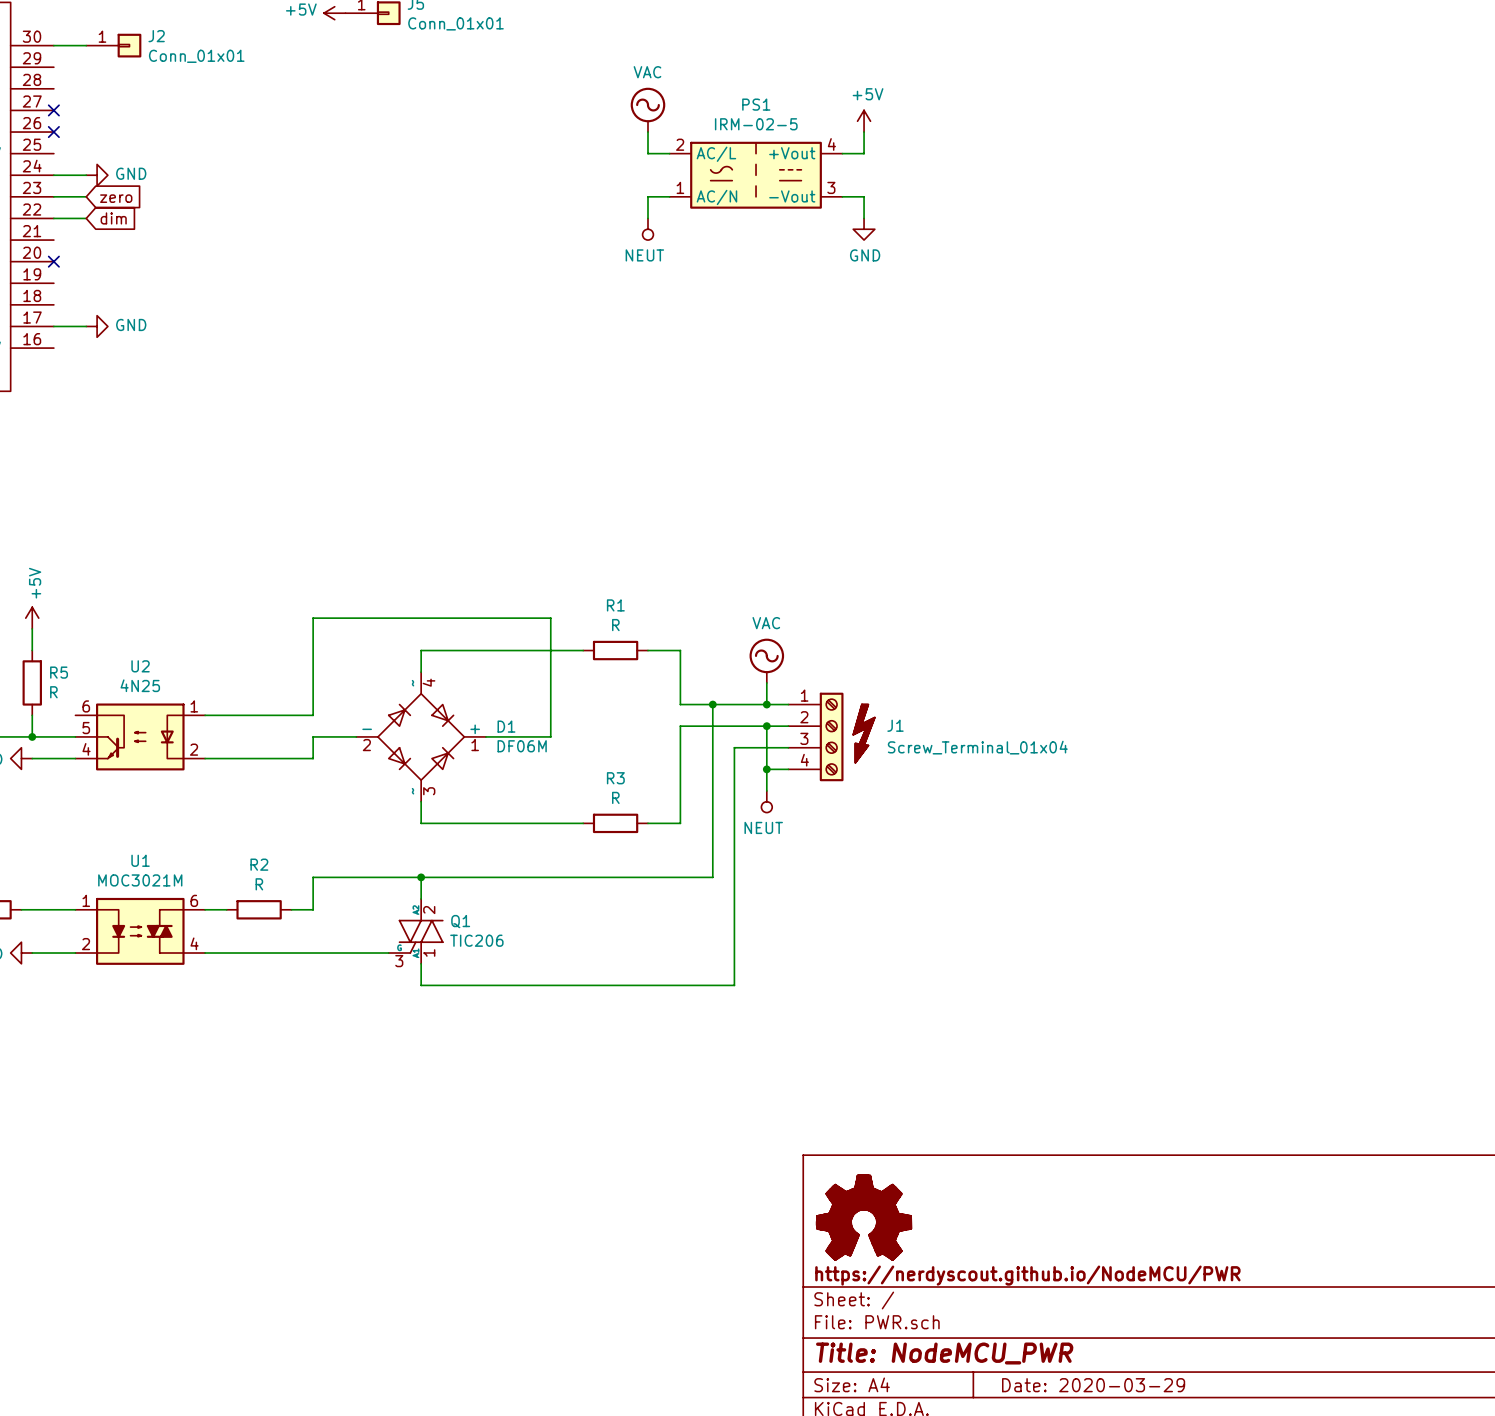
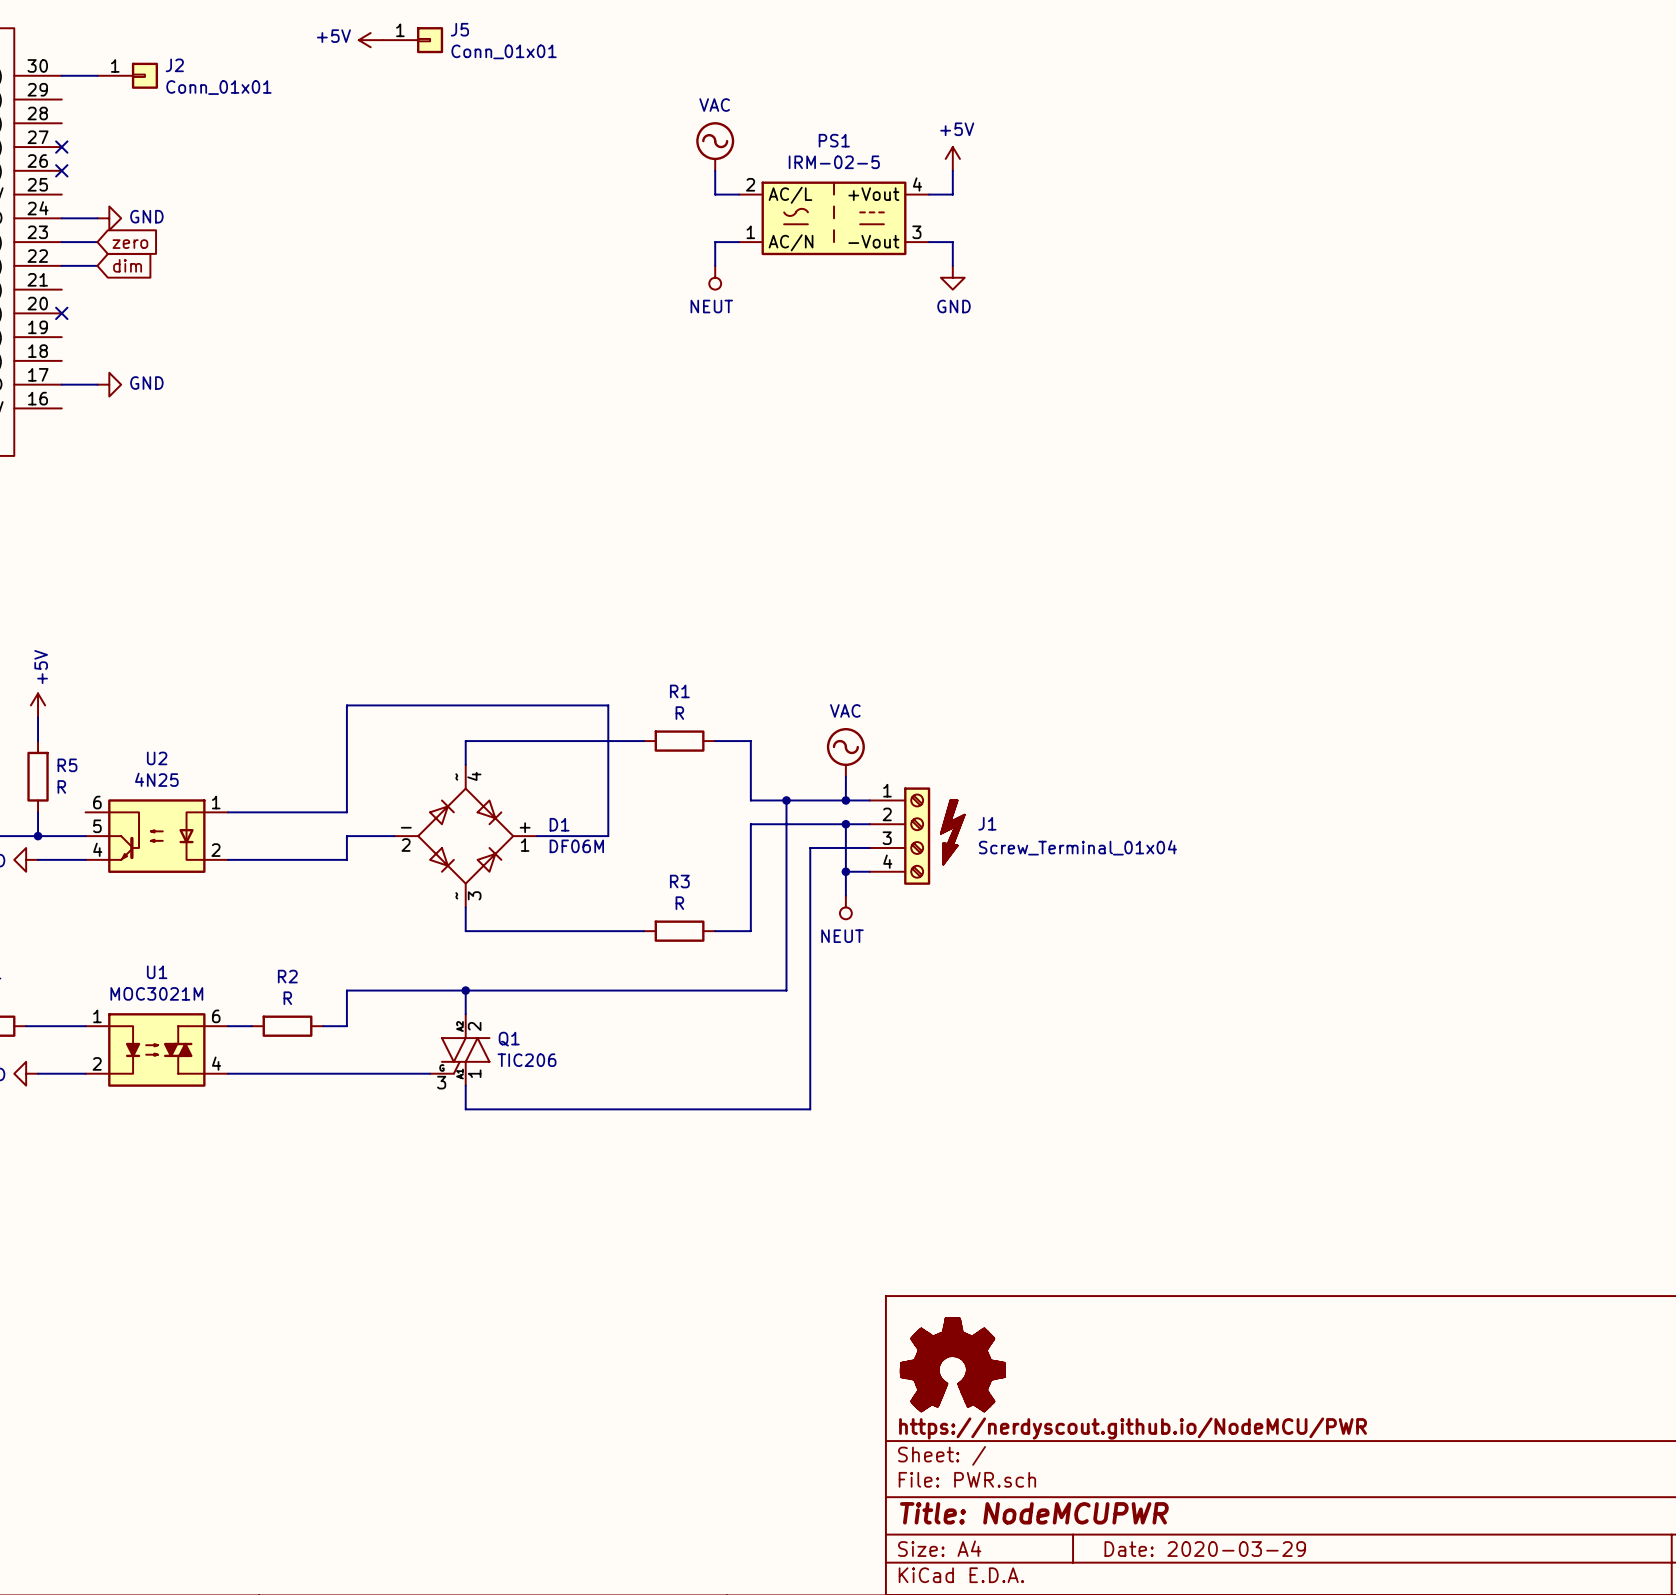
title block: Title: NodeMCU_PWR (944, 1353) -> Title: NodeMCUPWR (1034, 1513)

